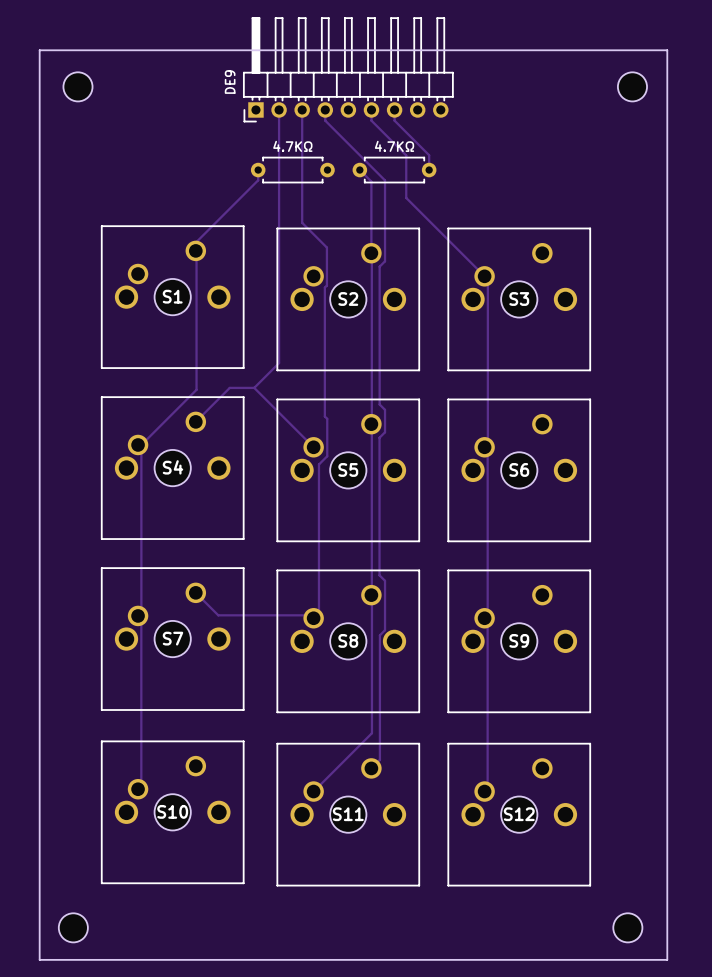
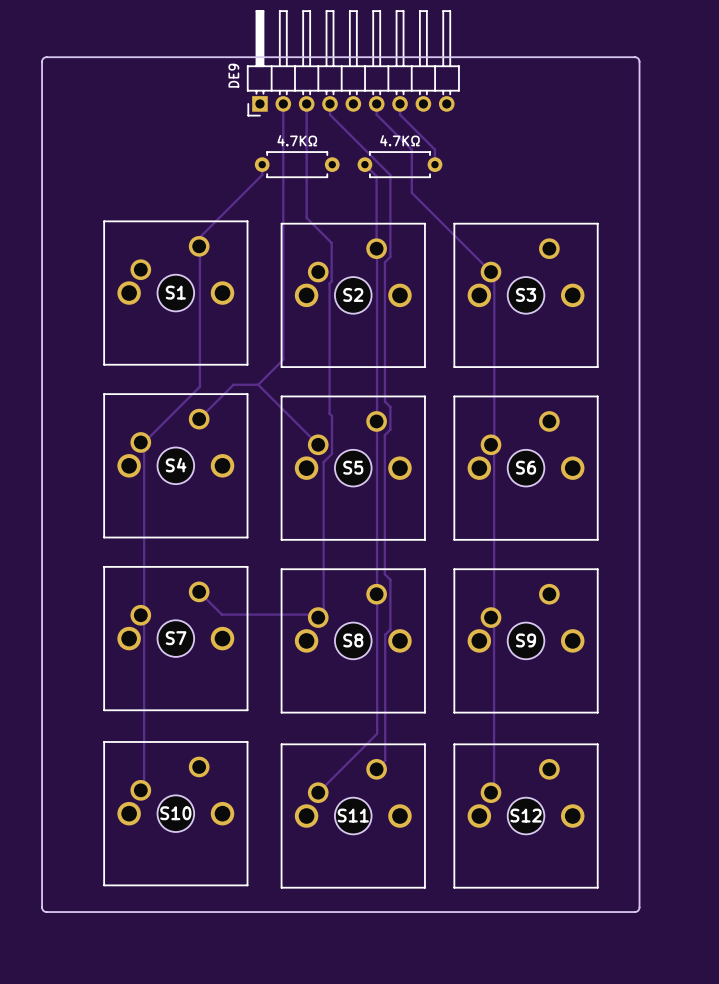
board edge: (39, 50) (39, 959) (667, 959) (667, 50) (39, 50) -> (46, 57) (42, 61) (43, 910) (46, 912) (637, 911) (639, 907) (638, 59) (634, 57) (46, 57)
part: (77, 86) -> none
part: (632, 86) -> none
part: (73, 927) -> none
part: (627, 927) -> none

